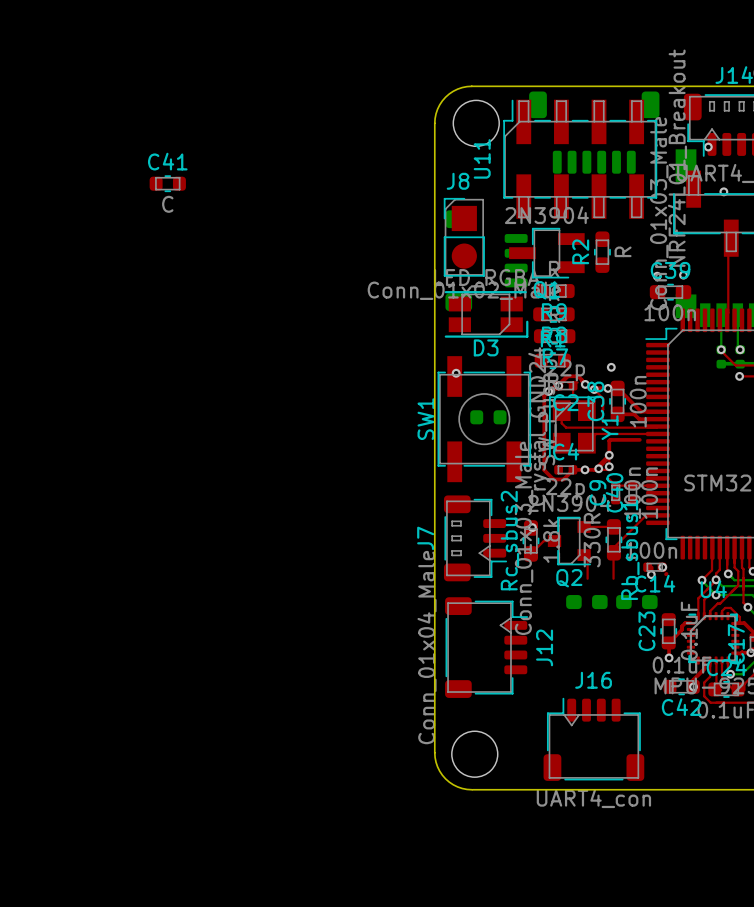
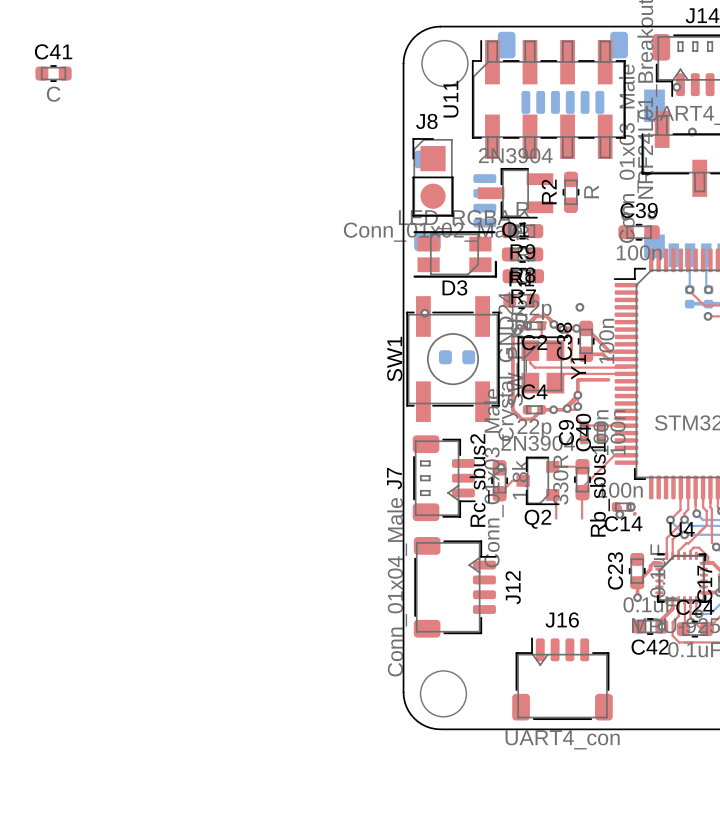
C41 position: (167, 183) -> (53, 73)
top track: (731, 238) (728, 241) (727, 320) -> none
part: (586, 602) -> none
part: (636, 602) -> none

